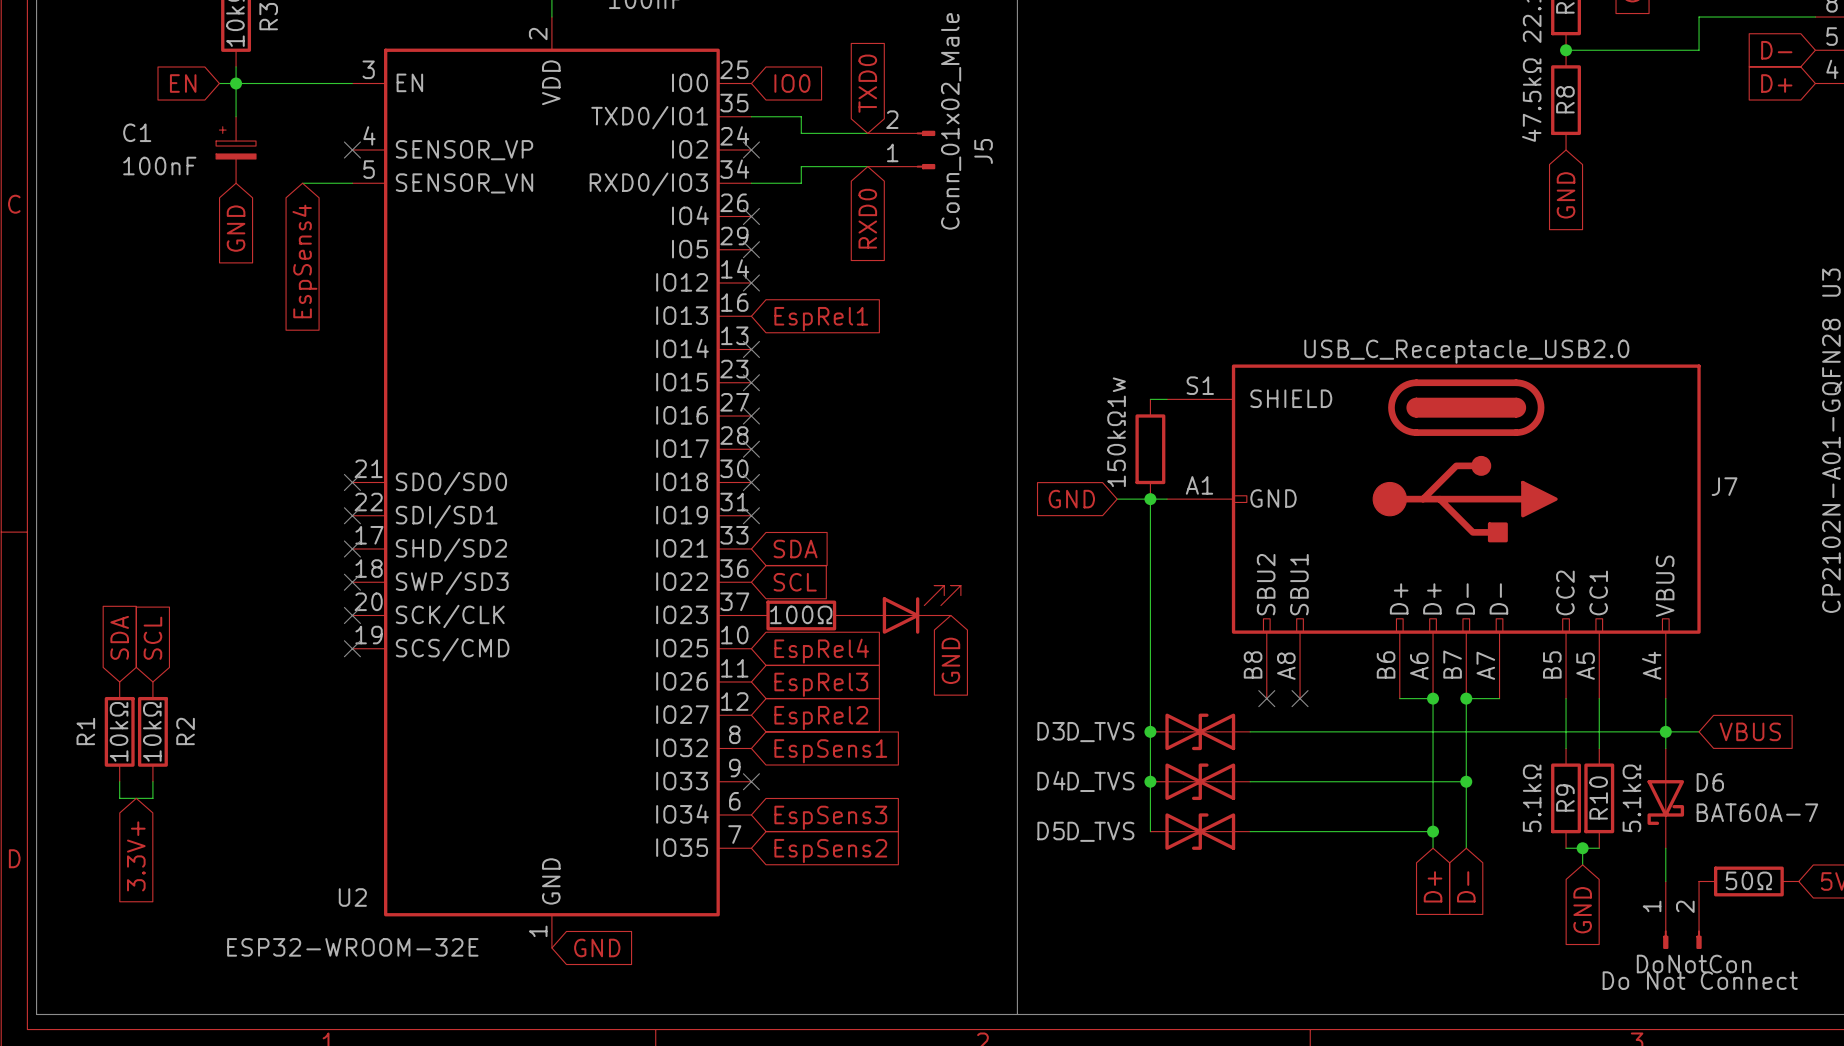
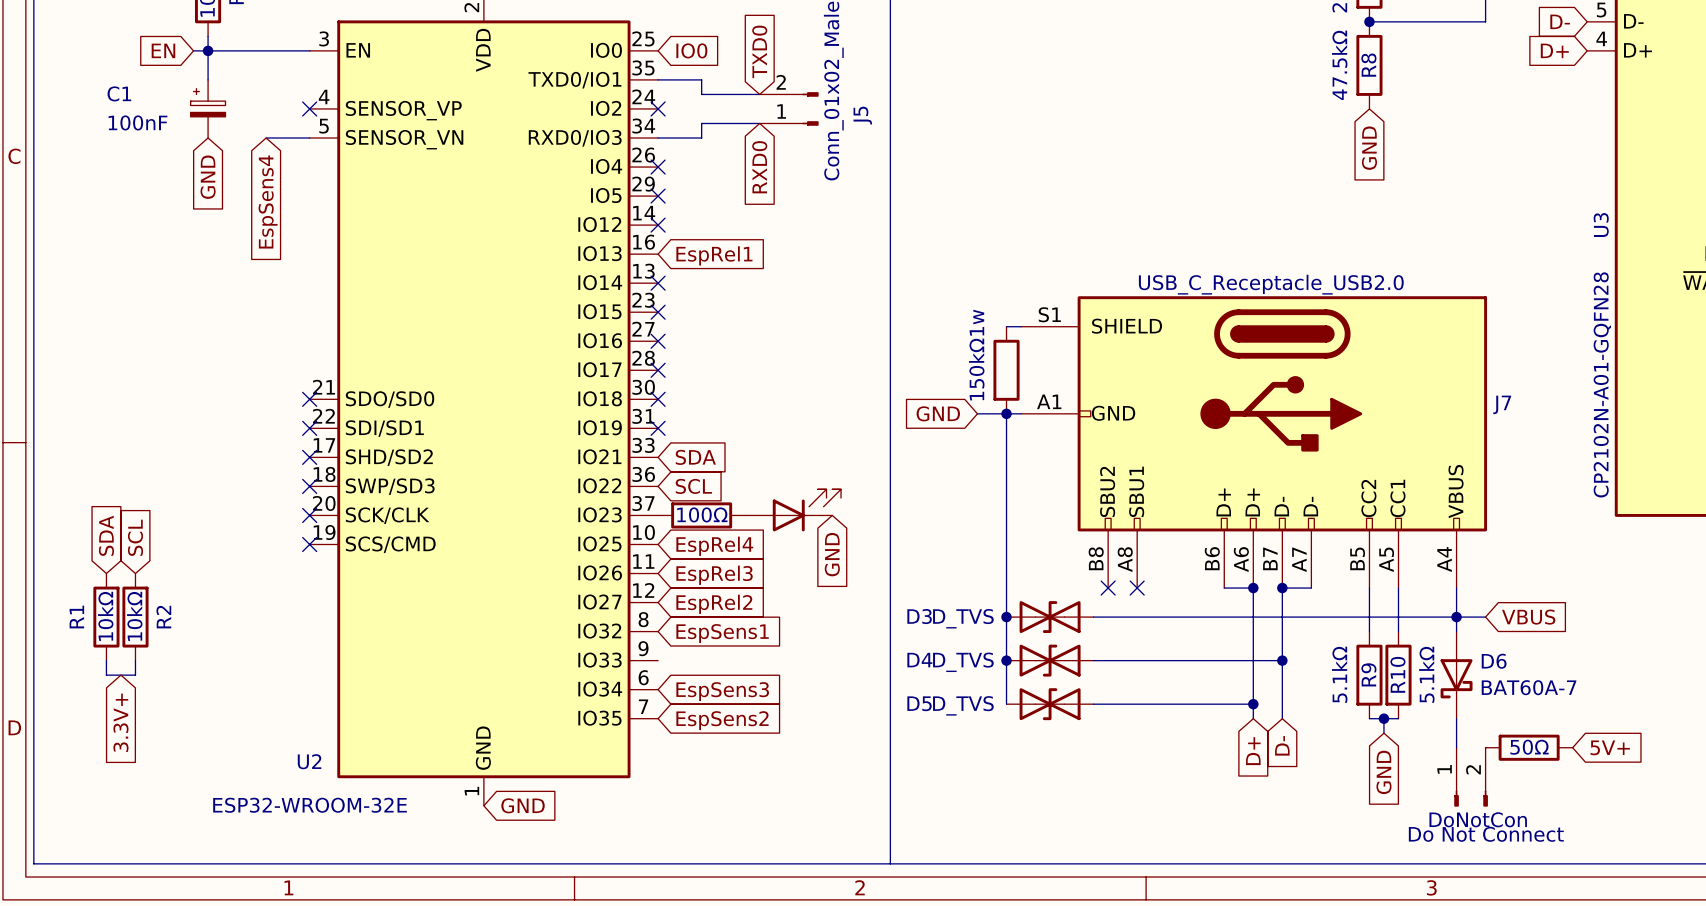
no-connect mark: (751, 781) -> none

